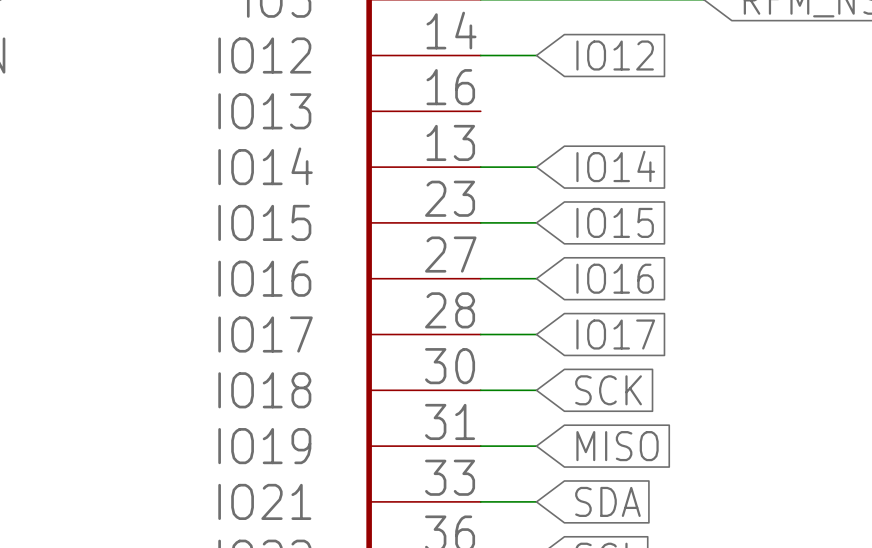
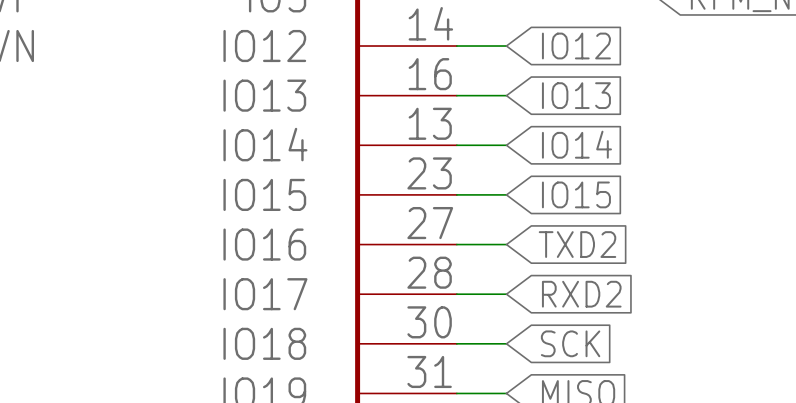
wire: none -> (456, 95) (506, 95)
global label: none -> IO13 (576, 95)
global label: IO16 (615, 278) -> TXD2 (577, 244)
global label: IO17 (615, 334) -> RXD2 (581, 294)

